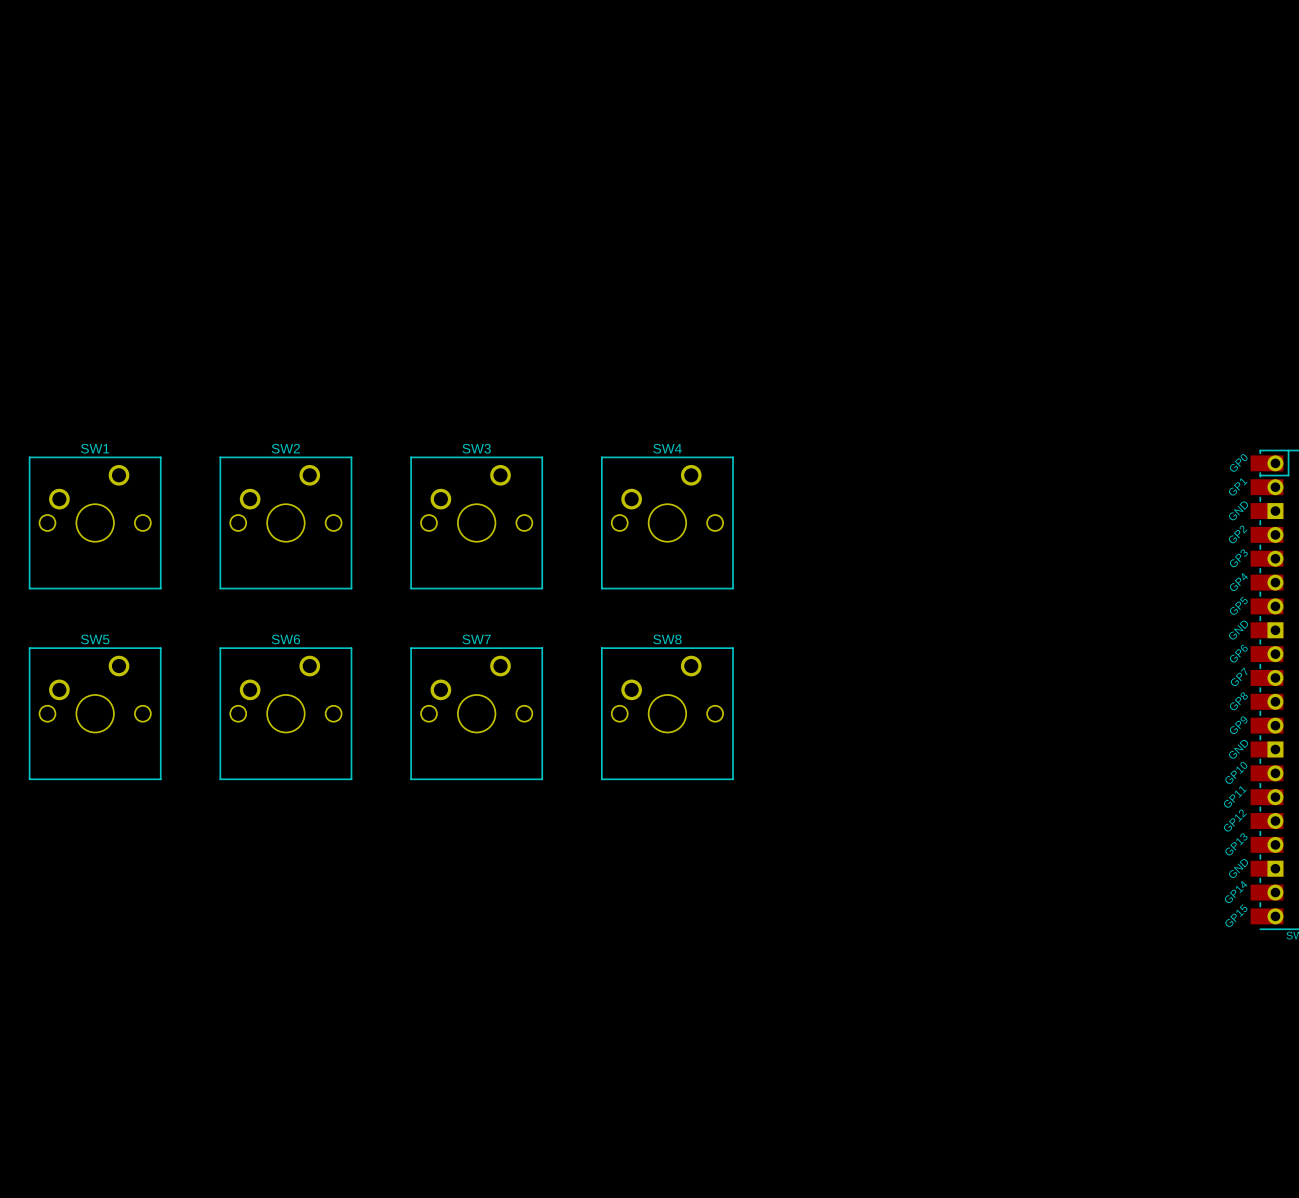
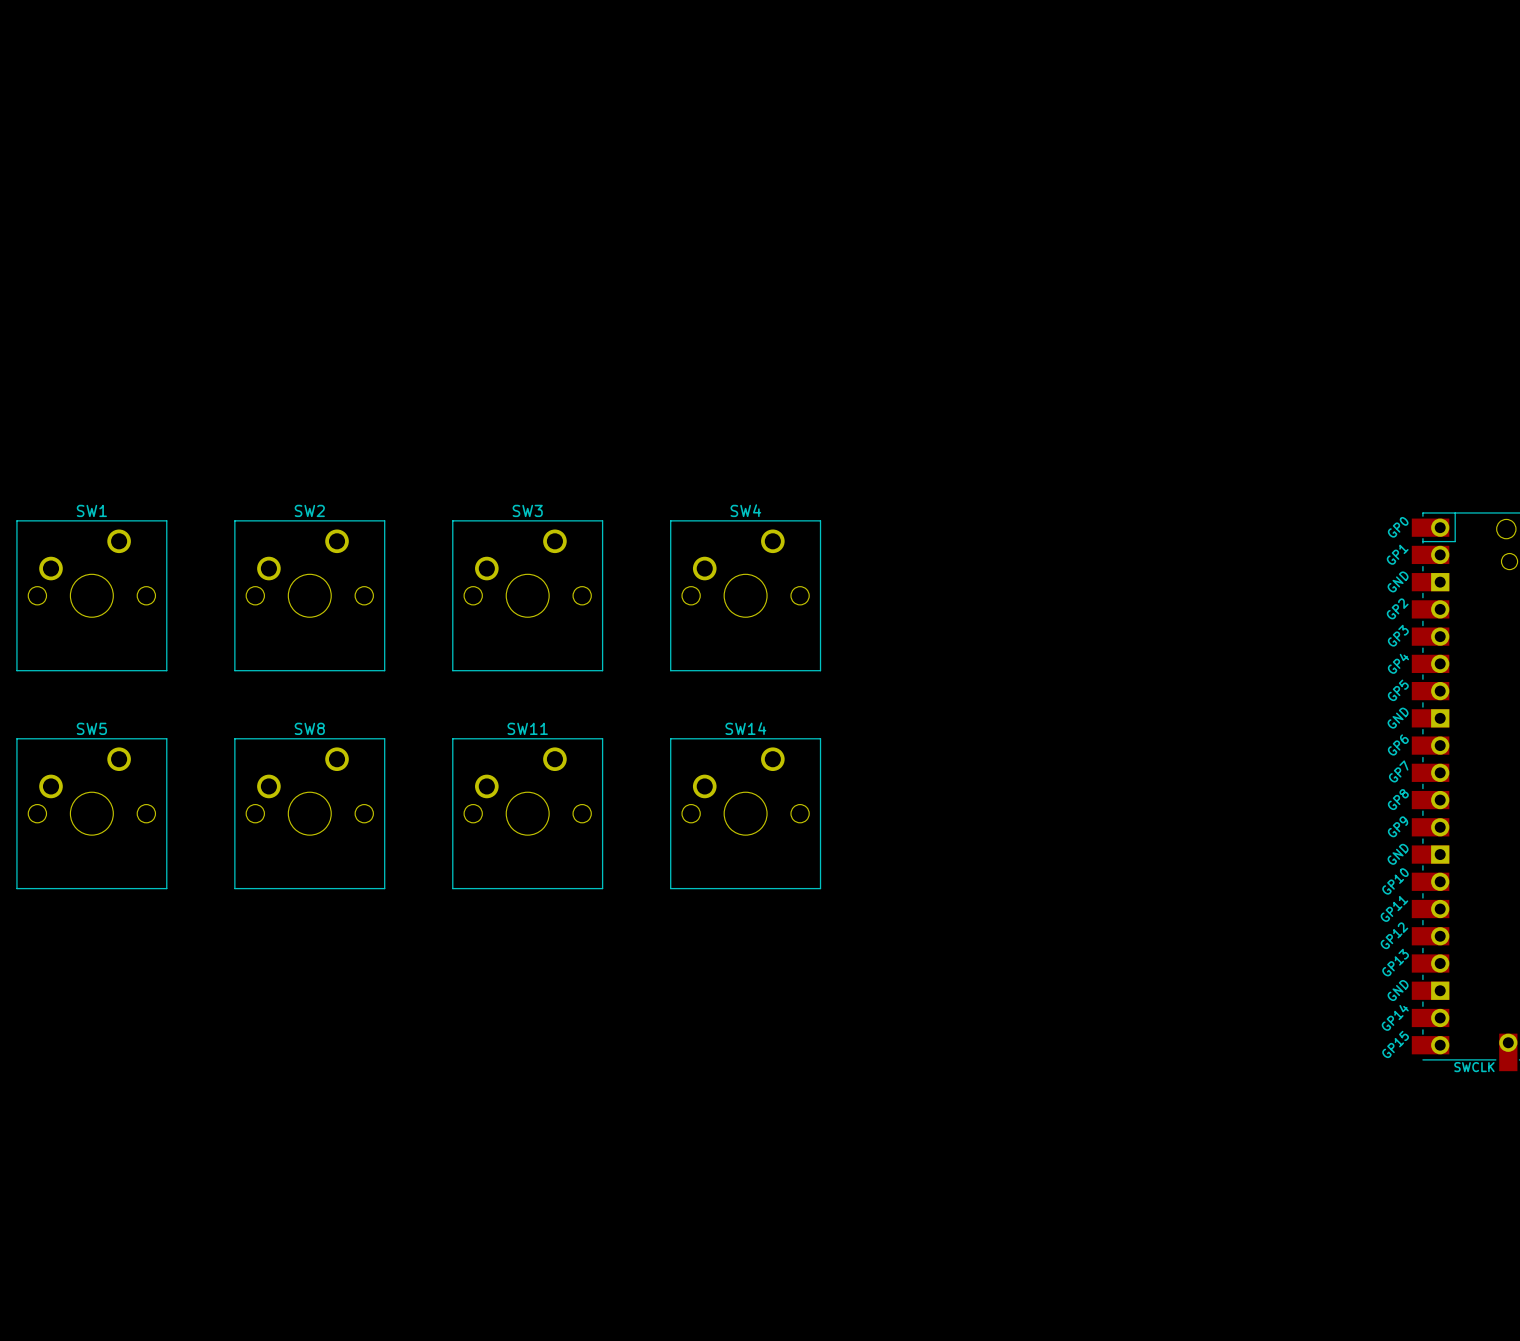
SW6 name: SW6 (285, 639) -> SW8 (309, 728)
SW7 name: SW7 (476, 639) -> SW11 (527, 728)
SW8 name: SW8 (667, 639) -> SW14 (745, 728)

